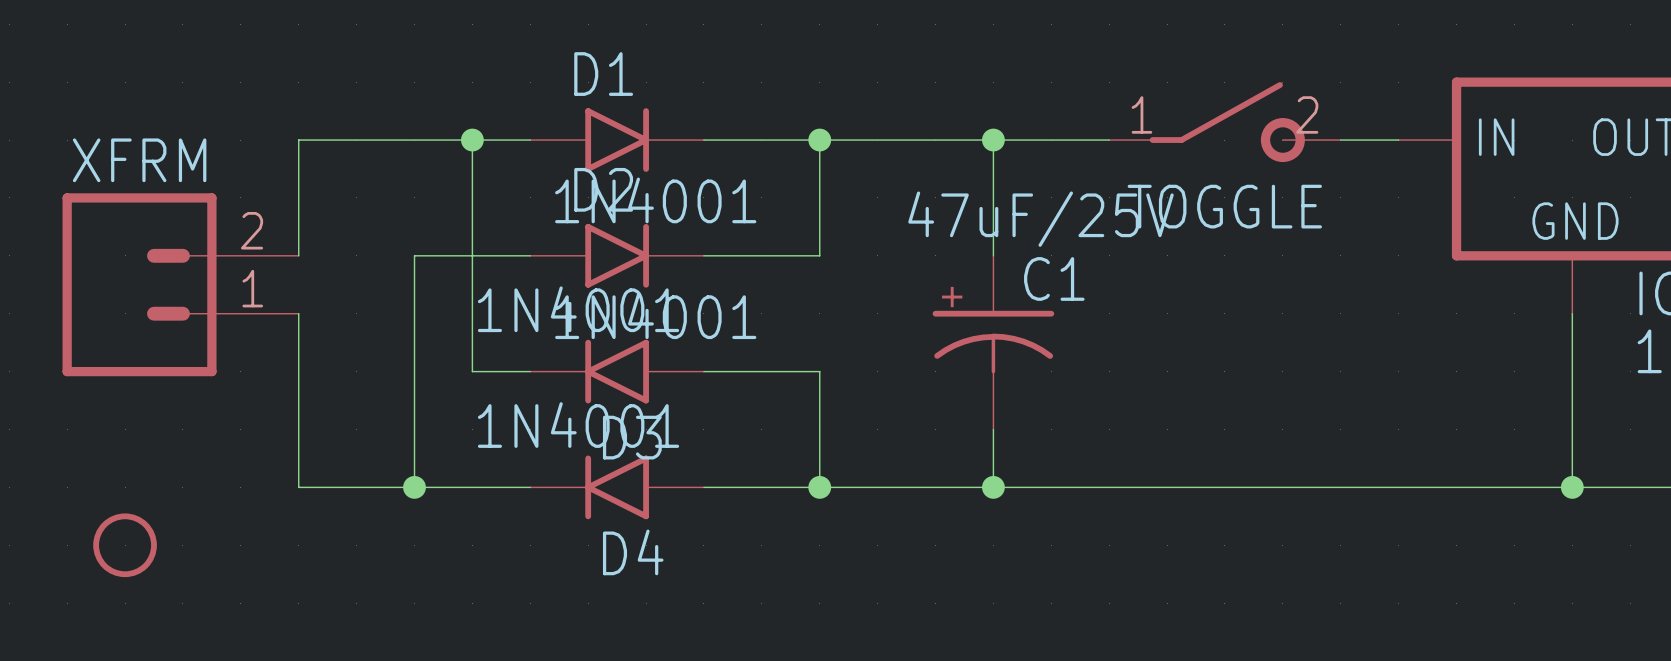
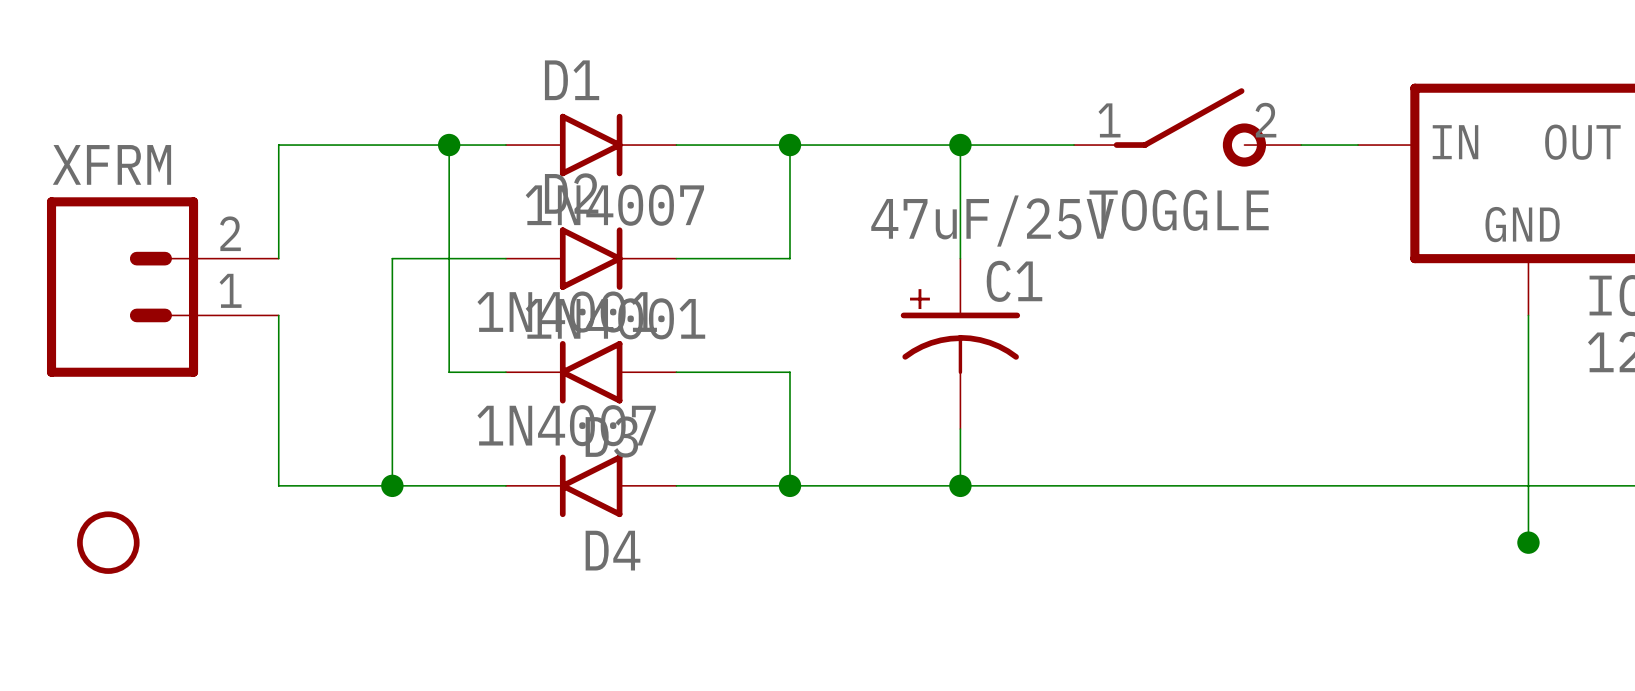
D1 value: 1N4001 (655, 200) -> 1N4007 (614, 205)
D4 value: 1N4001 (578, 425) -> 1N4007 (566, 425)
wire: none -> (1528, 485) (1528, 542)
junction position: (1572, 487) -> (1528, 542)

